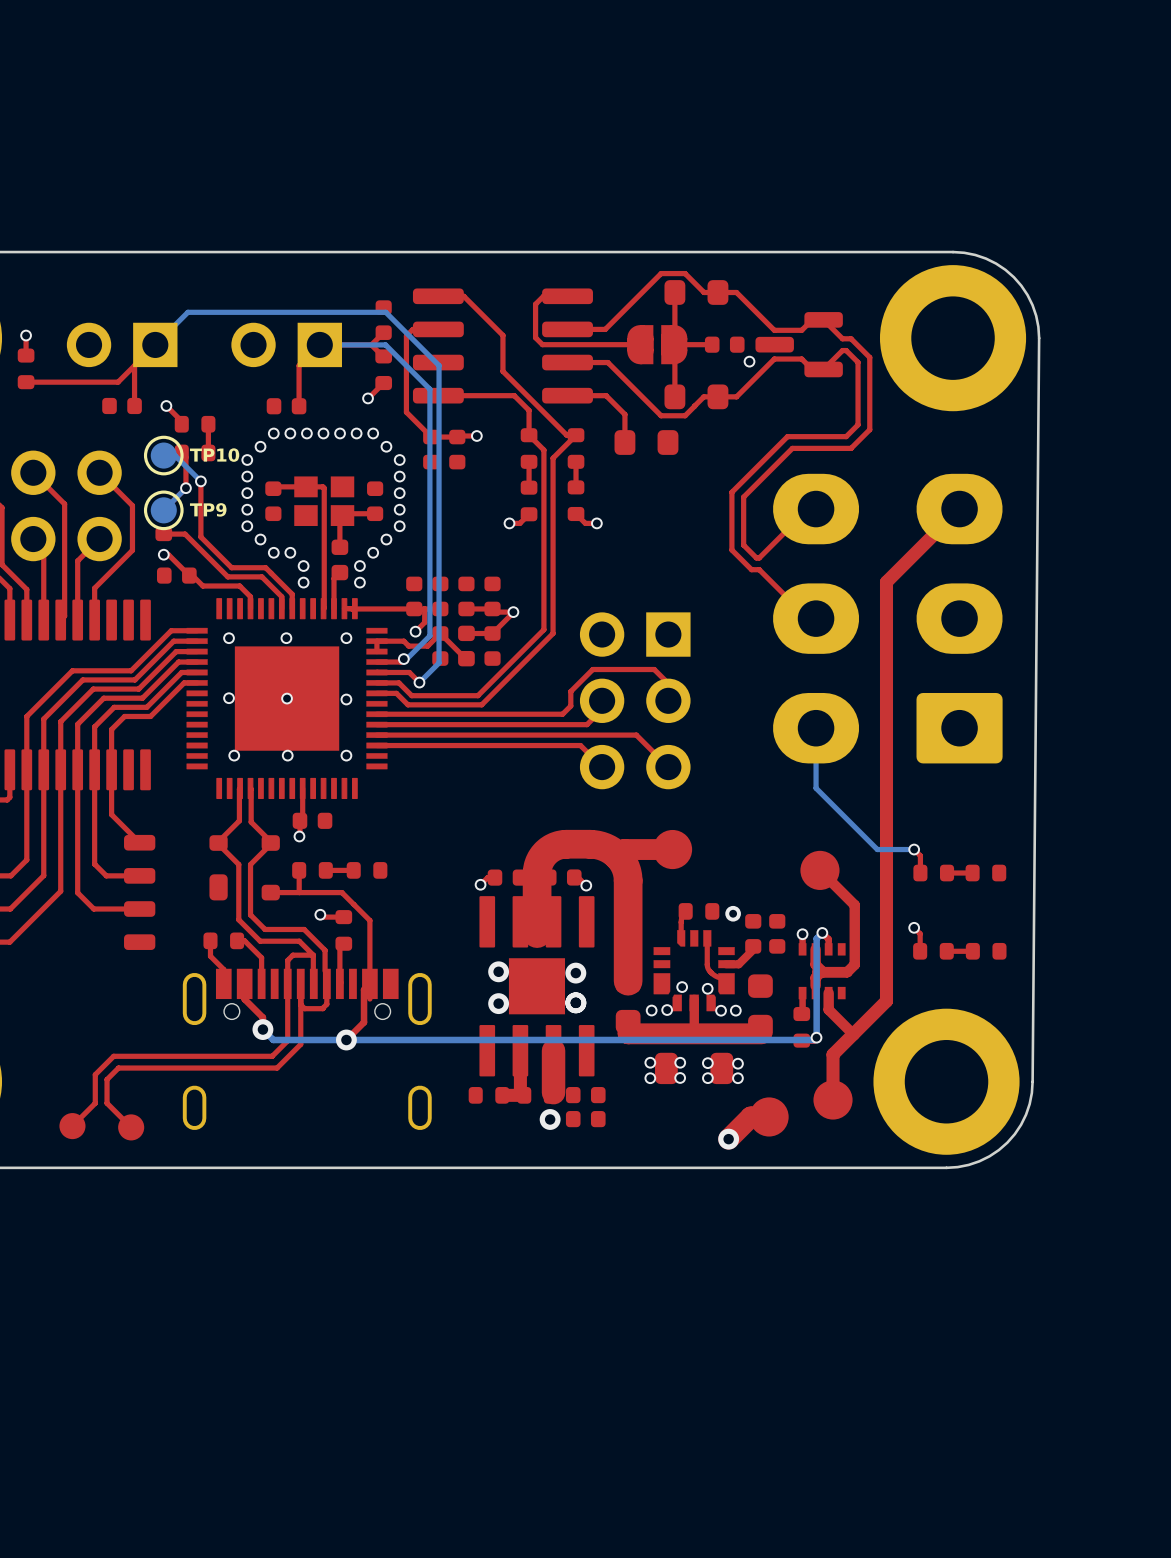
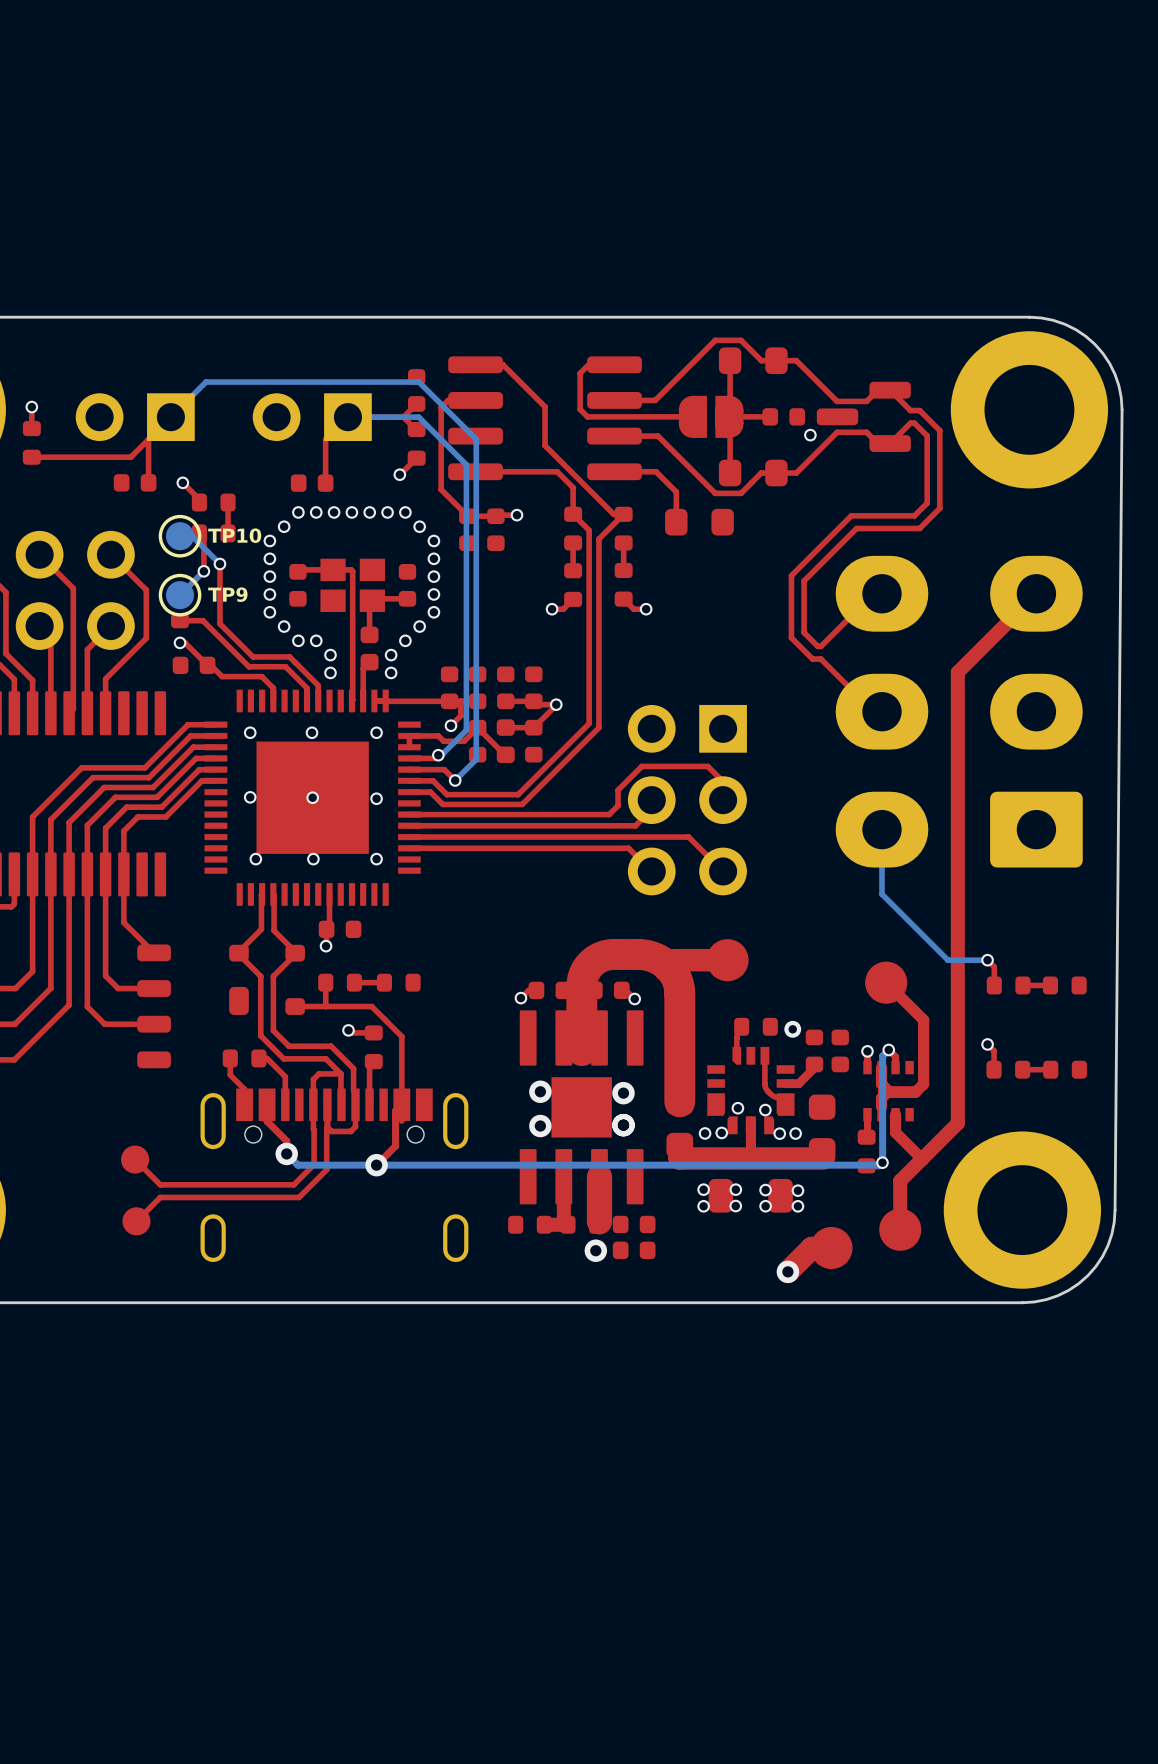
top track: (287, 1006) (287, 1040) (272, 1056) (113, 1056) (95, 1074) (95, 1103) (72, 1126) -> (313, 1129) (314, 1164) (293, 1184) (160, 1184) (135, 1159)
top track: (300, 1006) (300, 1044) (277, 1068) (118, 1068) (107, 1079) (107, 1103) (131, 1127) -> (327, 1129) (326, 1169) (299, 1197) (160, 1197) (136, 1221)
part: none -> (135, 1159)
part: none -> (136, 1221)
part: (72, 1126) -> none
part: (131, 1127) -> none

